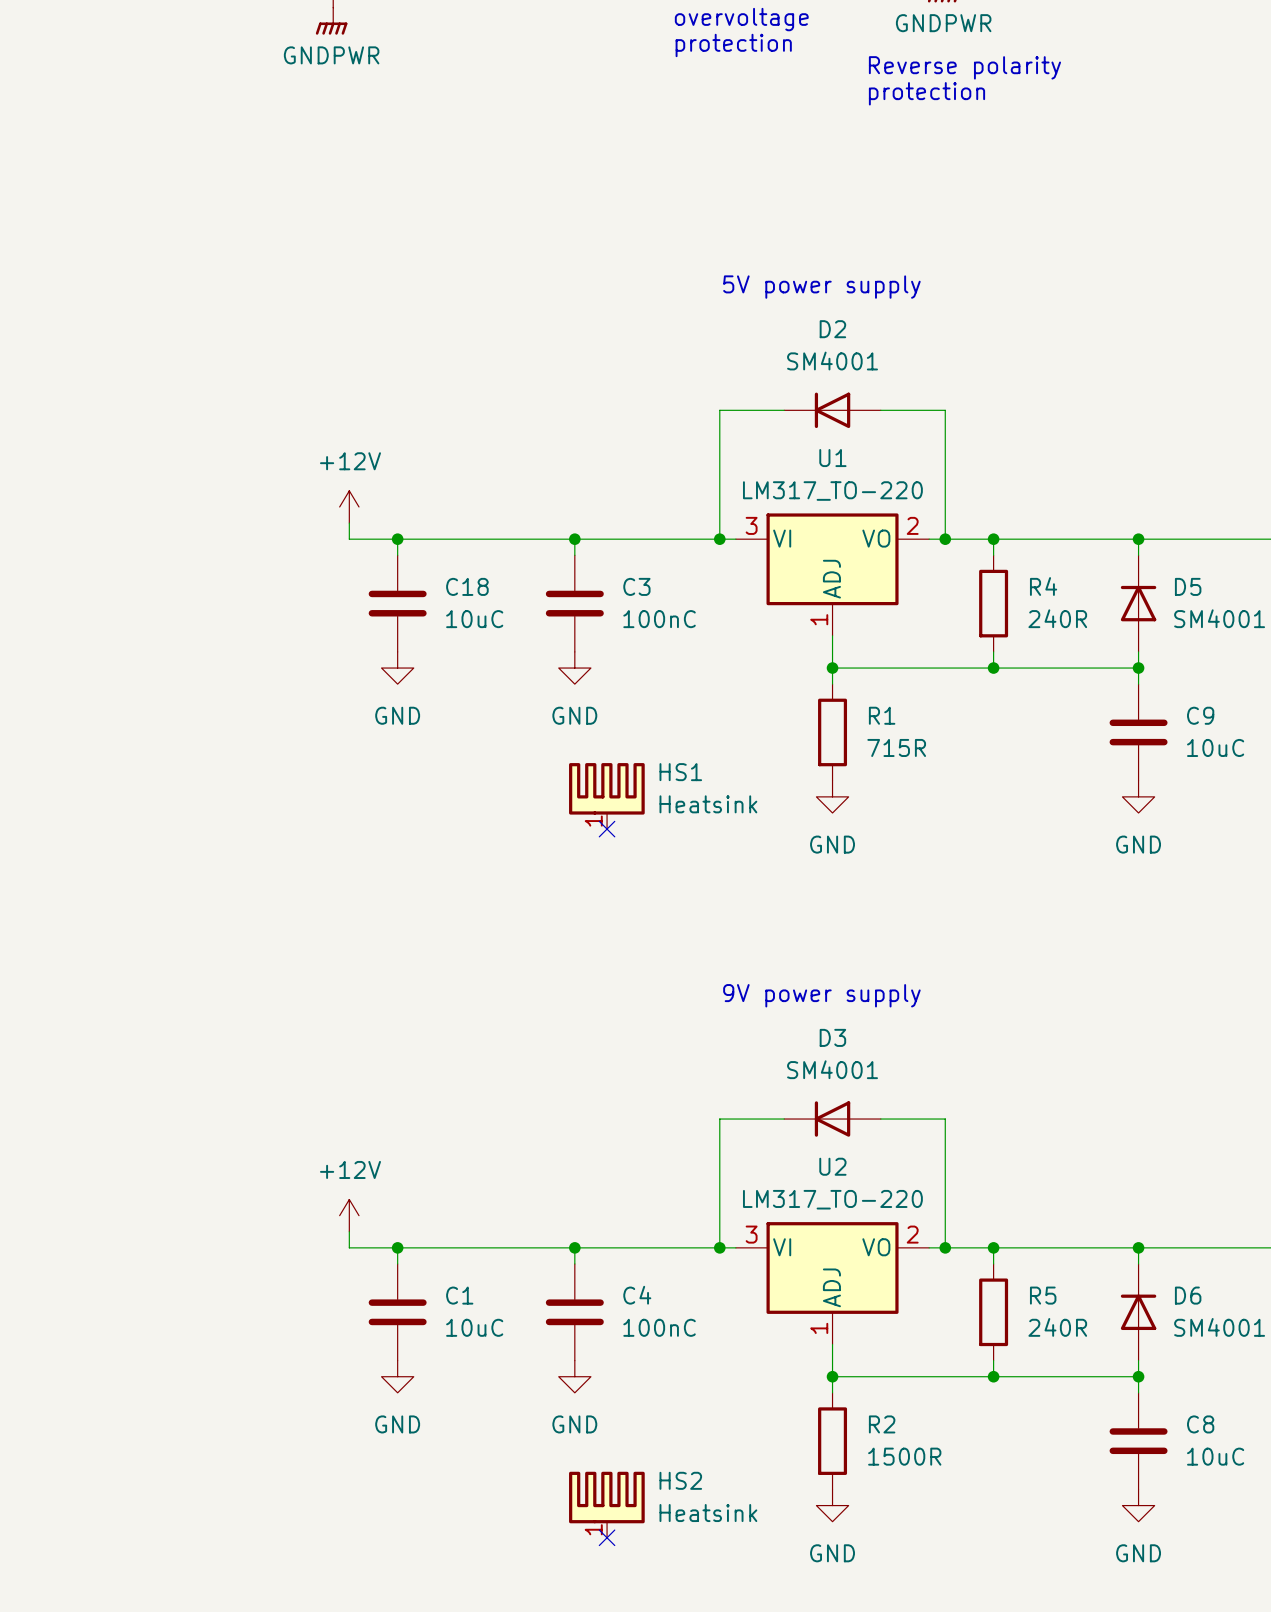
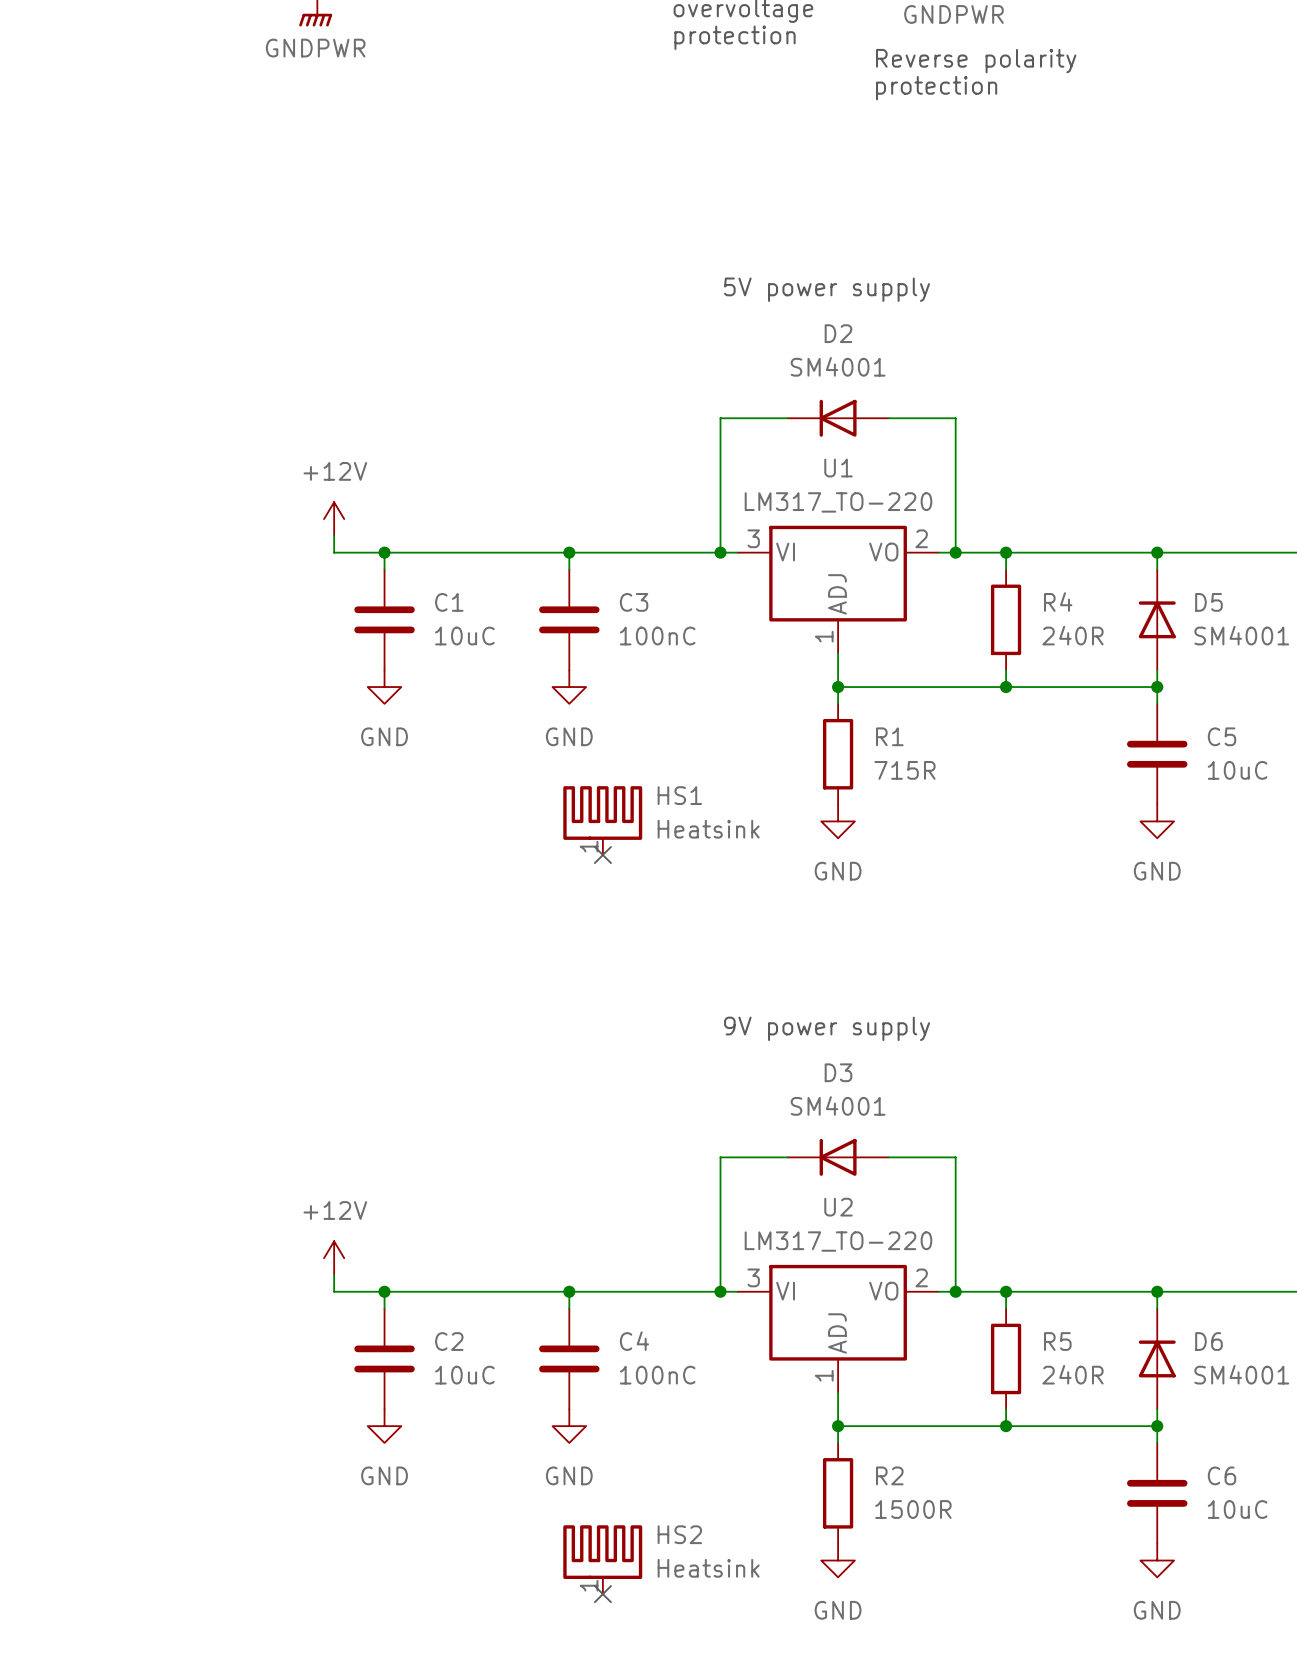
C18 name: C18 (467, 586) -> C1 (449, 602)
C9 name: C9 (1200, 715) -> C5 (1222, 736)
C1 name: C1 (459, 1295) -> C2 (449, 1341)
C8 name: C8 (1200, 1424) -> C6 (1222, 1475)

